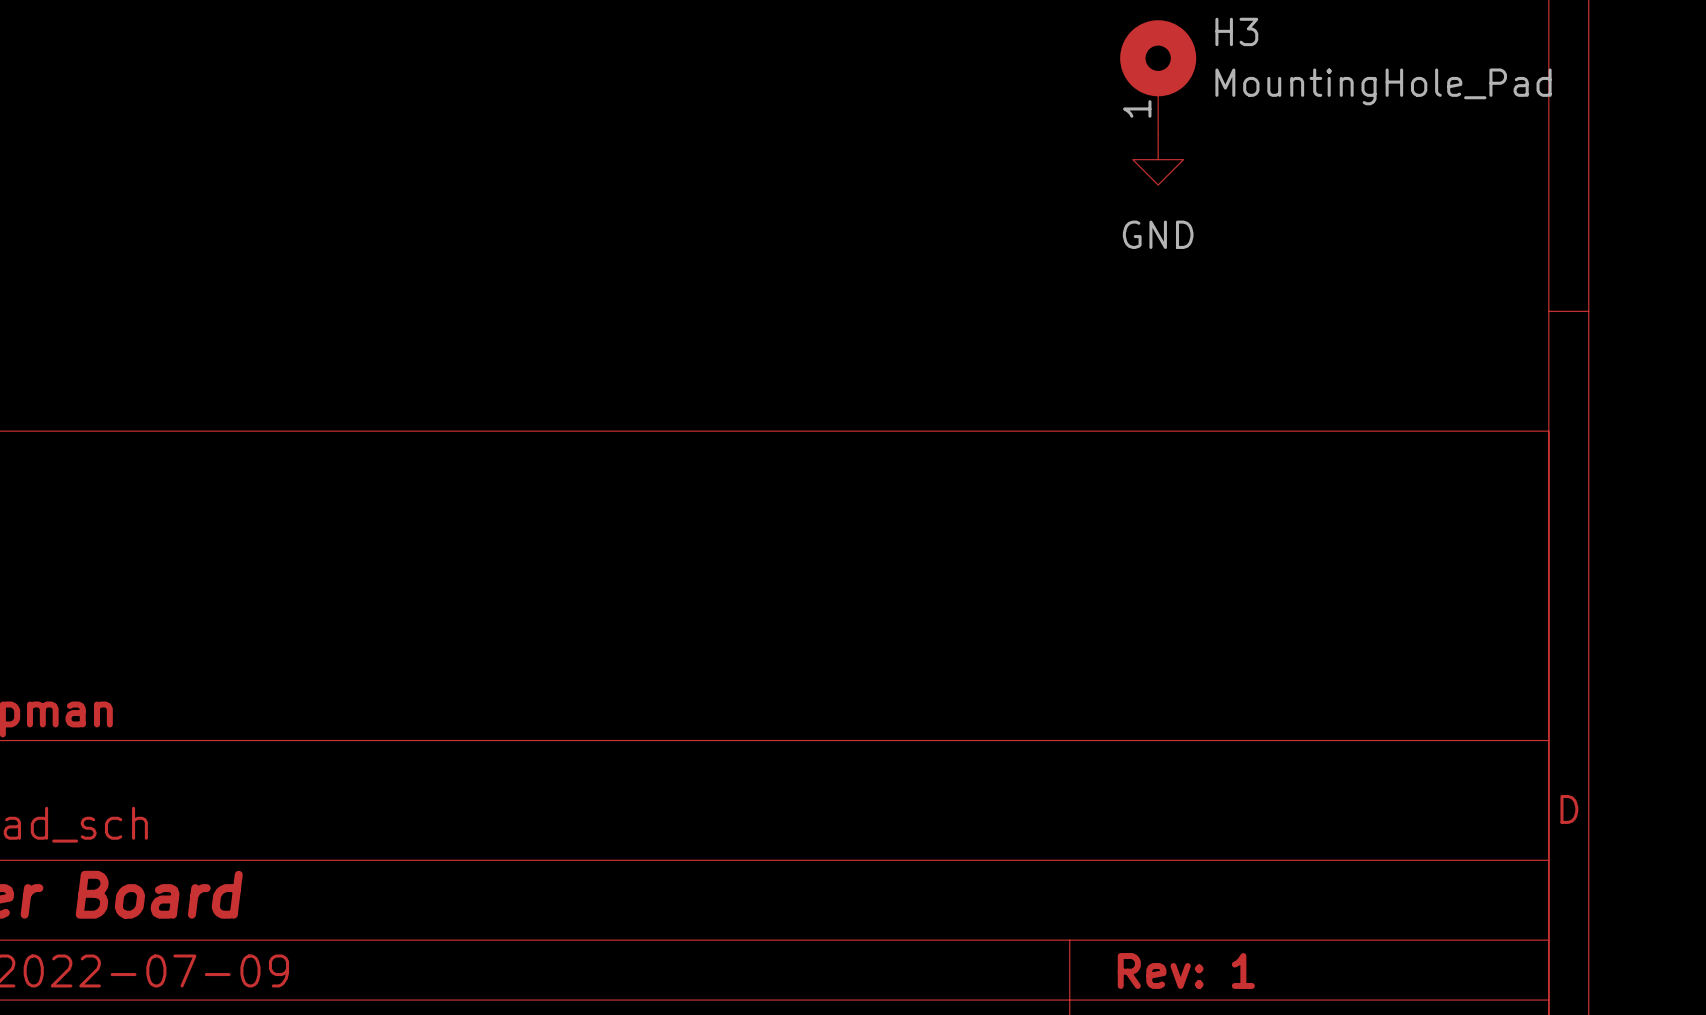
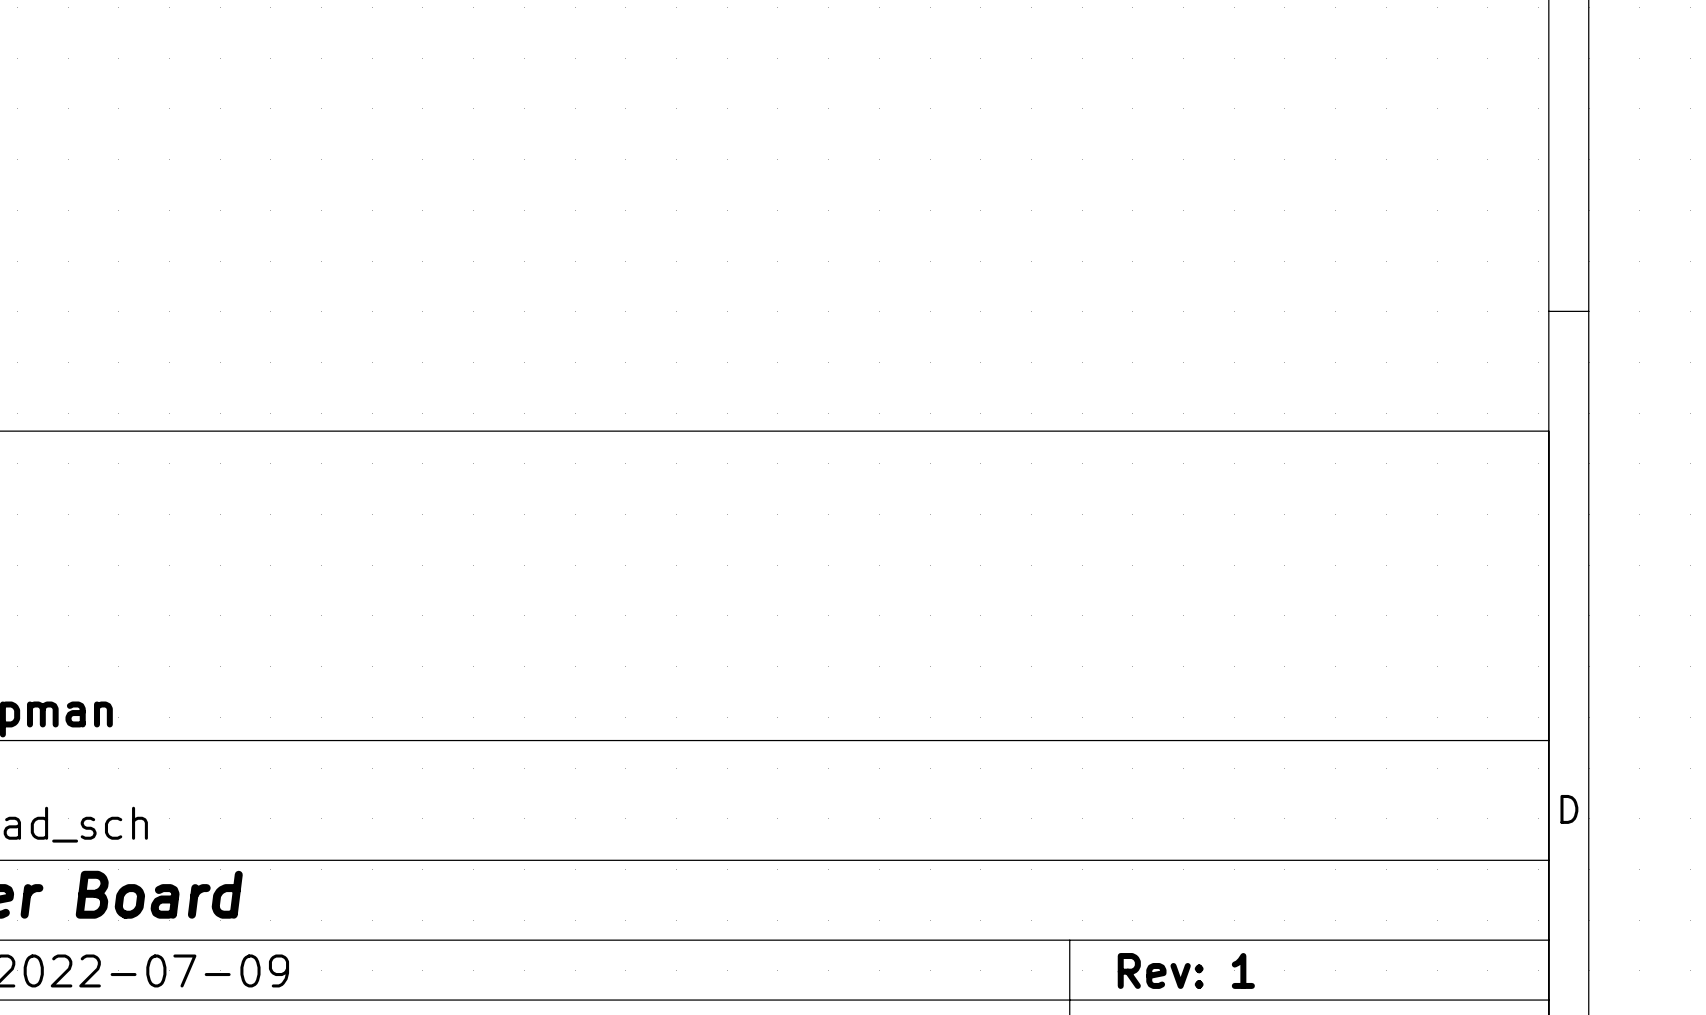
H3: MountingHole_Pad (1158, 77) -> none
power symbol: GND (1158, 159) -> none

